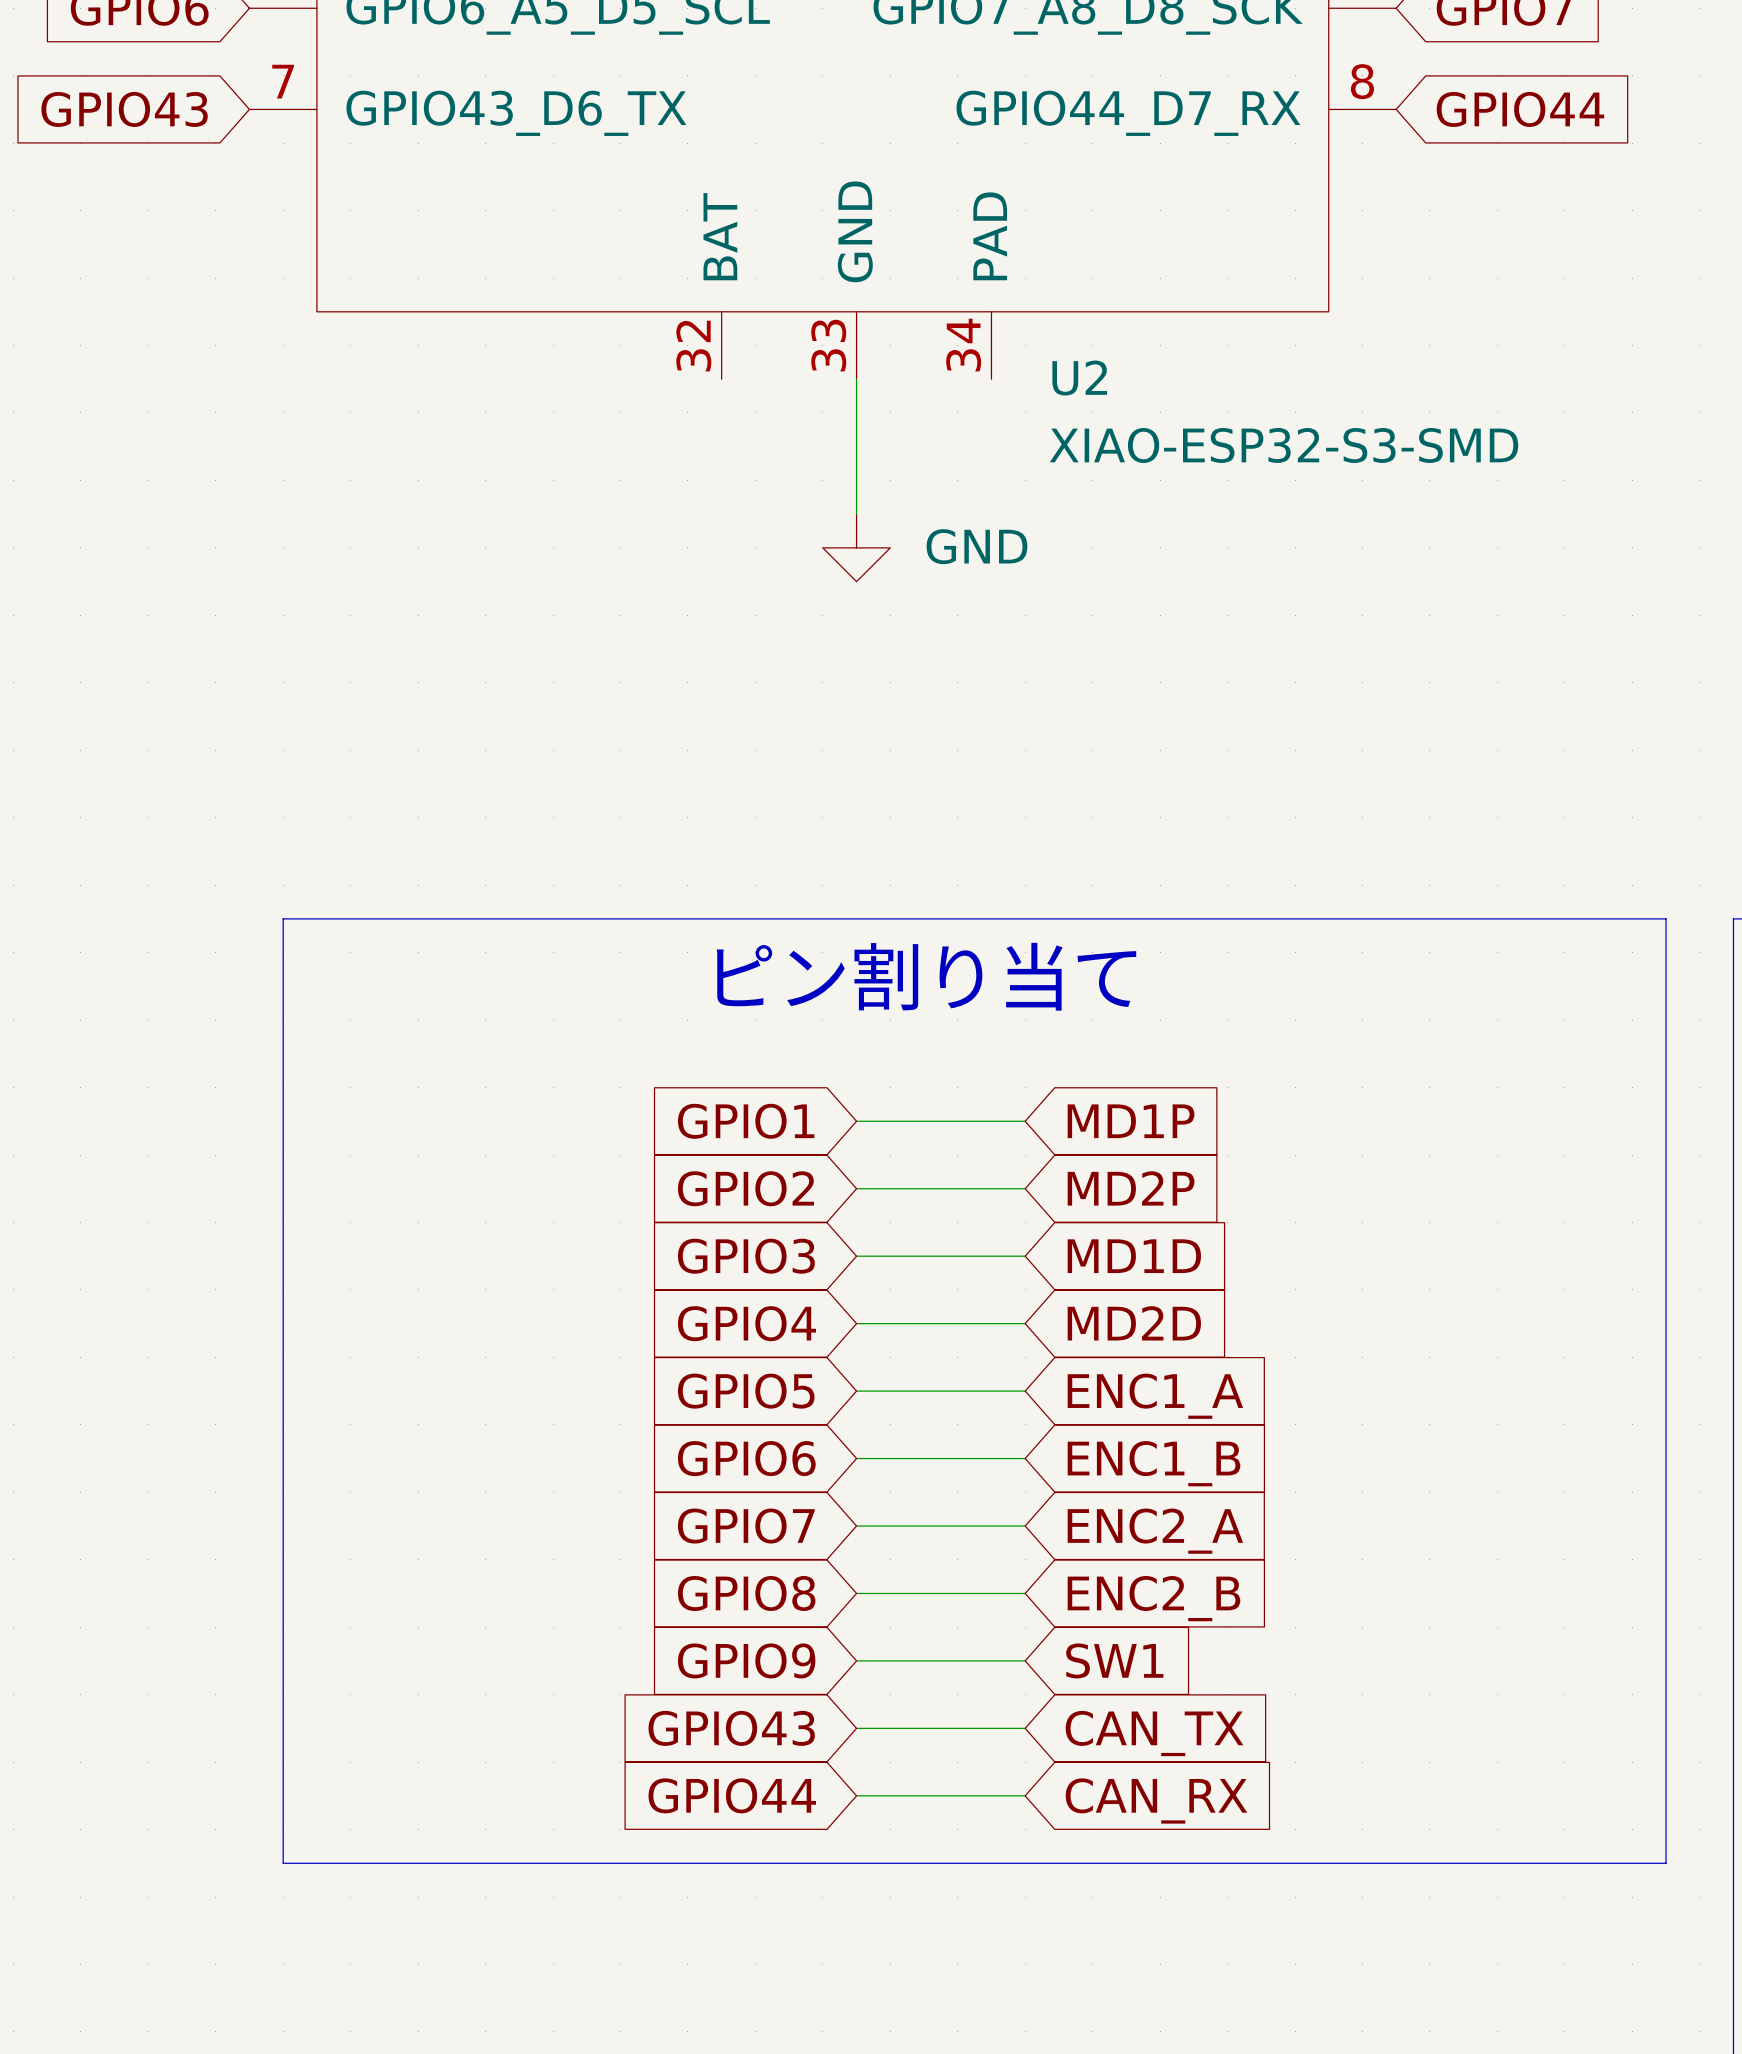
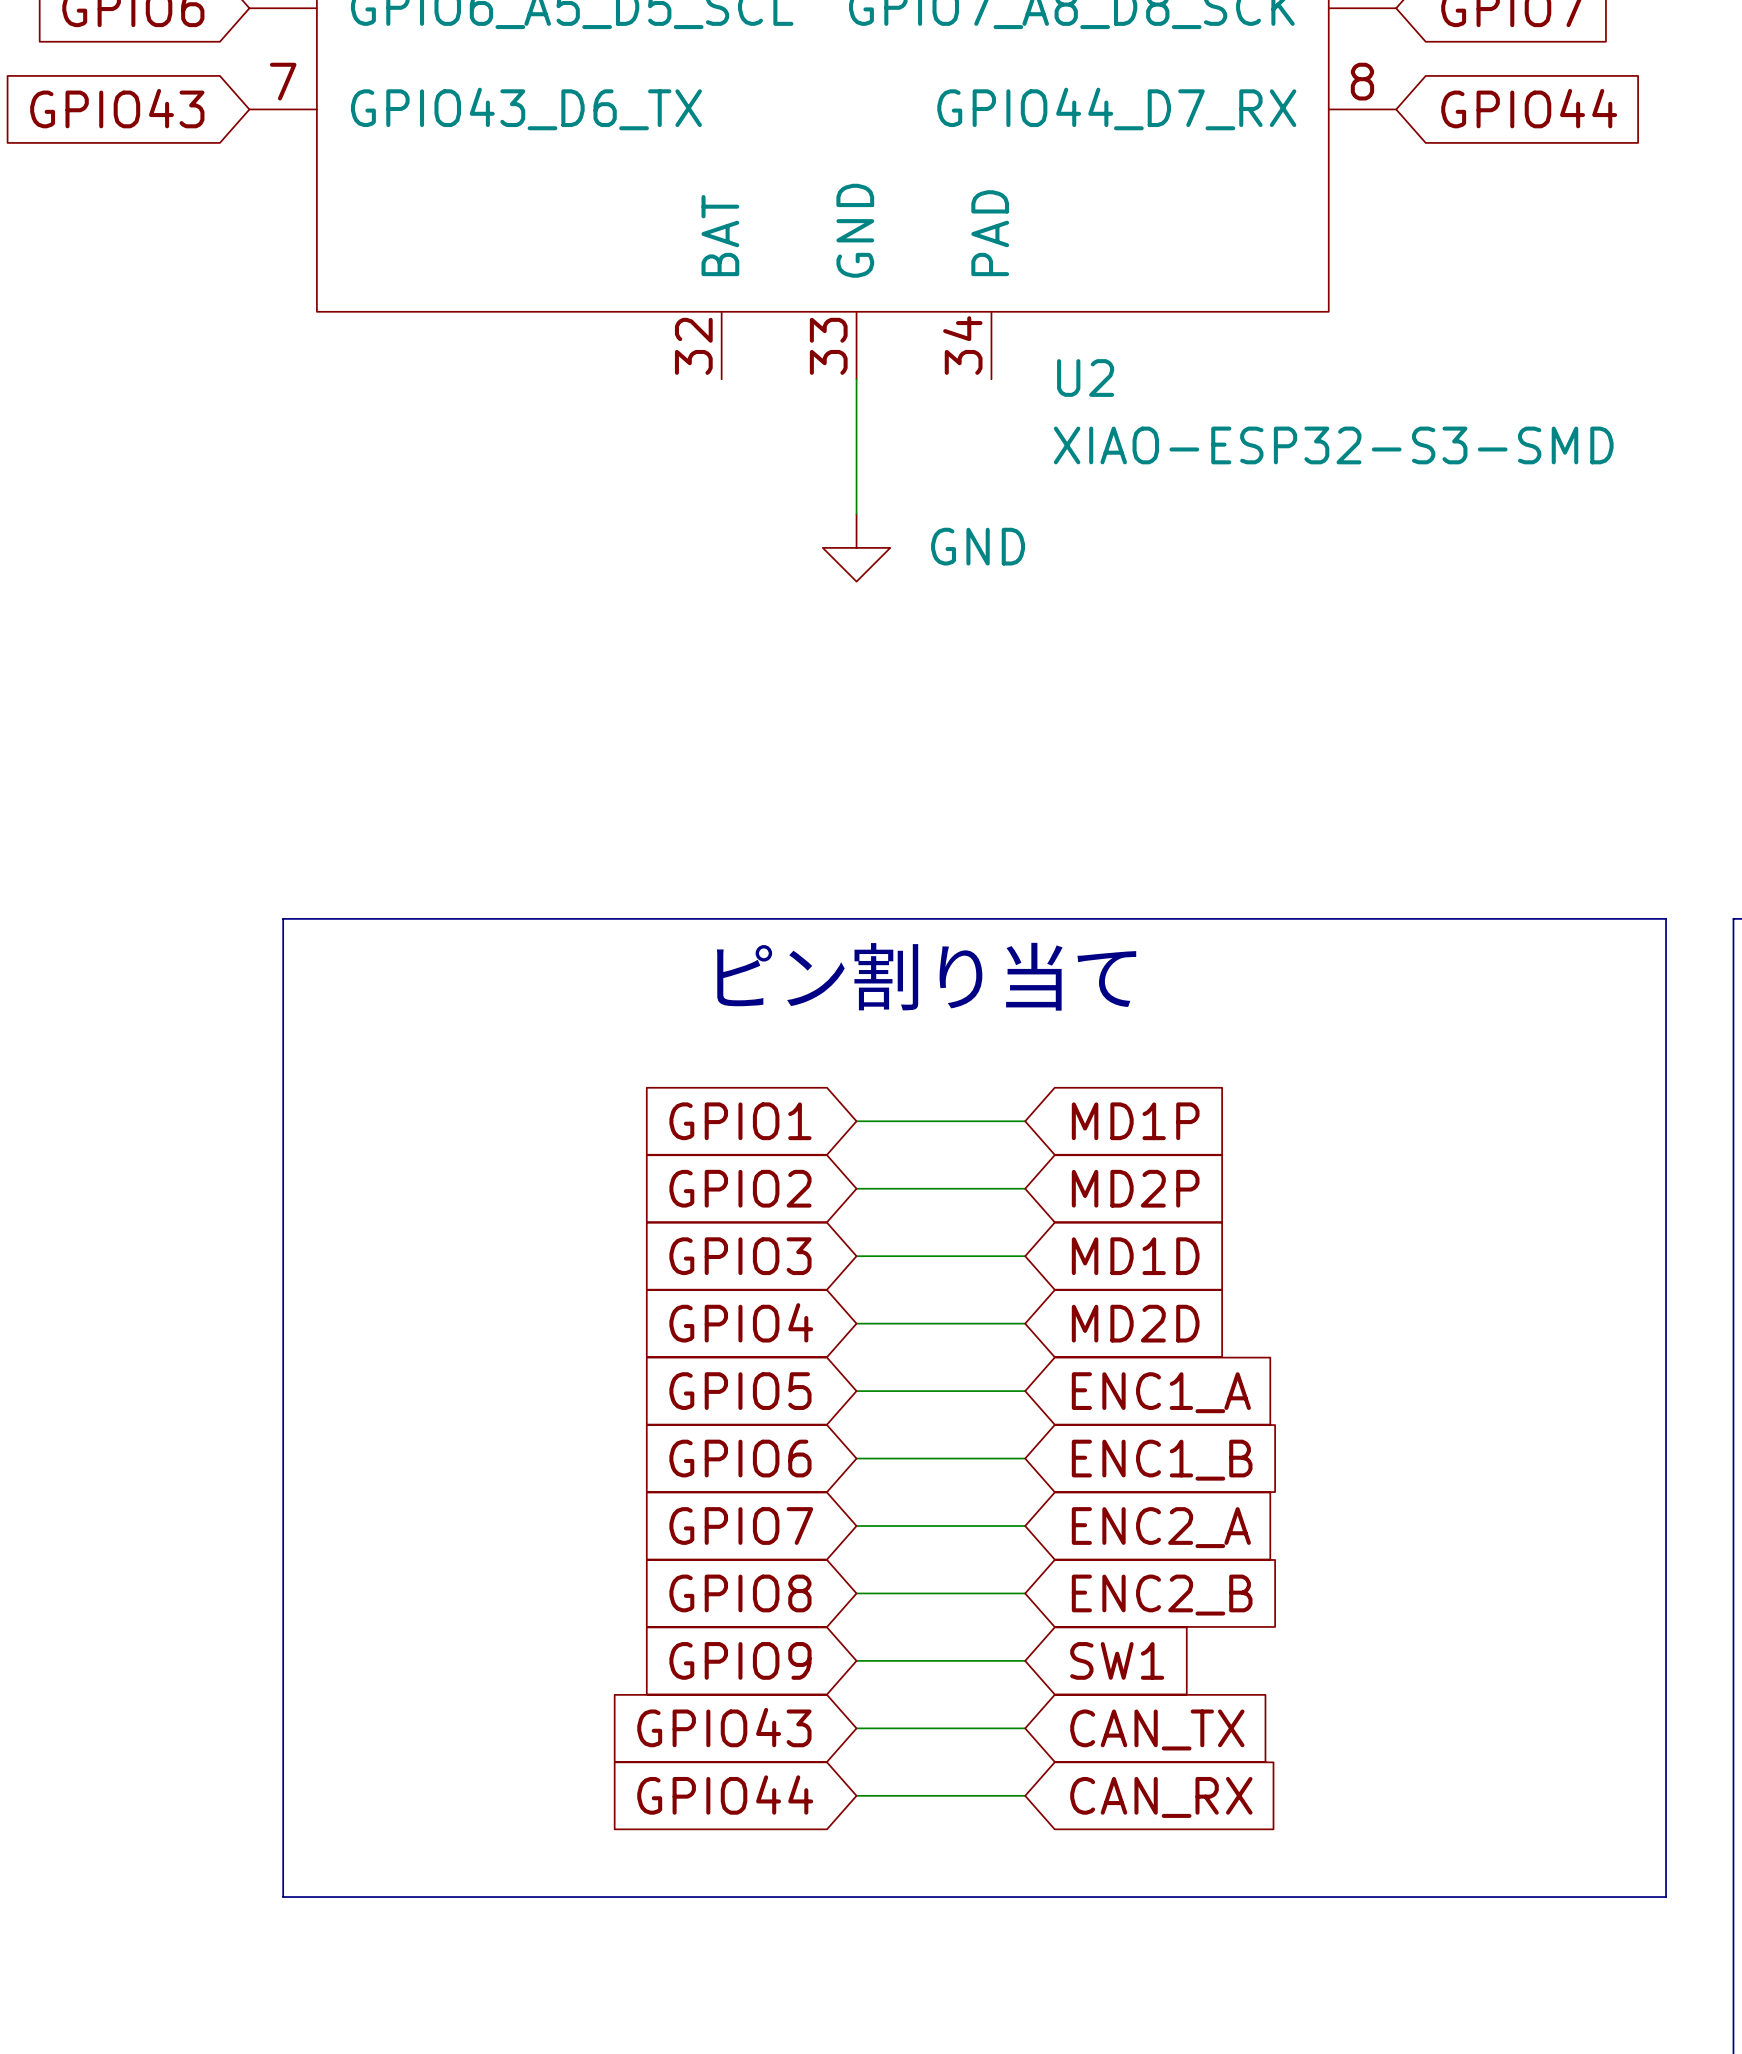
line: (283, 1863) (1666, 1863) -> (283, 1863) (283, 1897) (1666, 1897) (1666, 1863)

